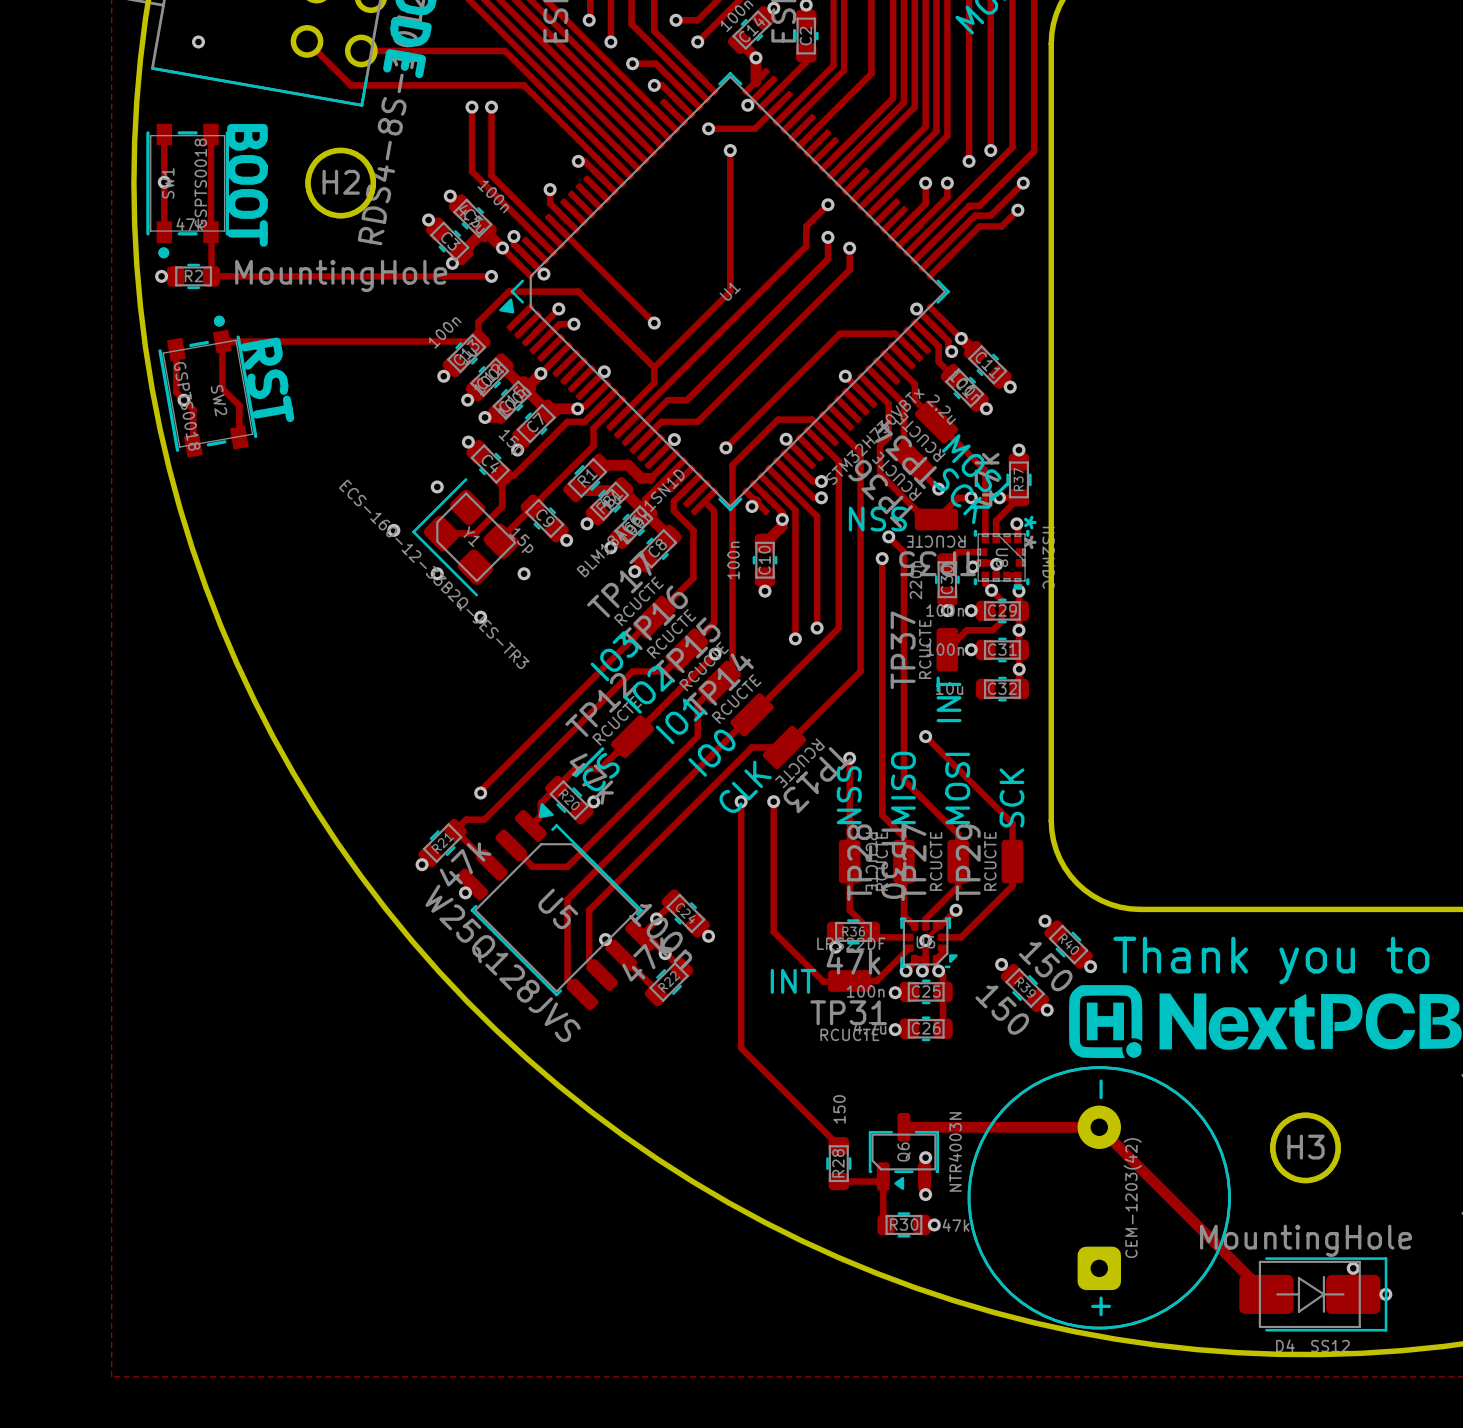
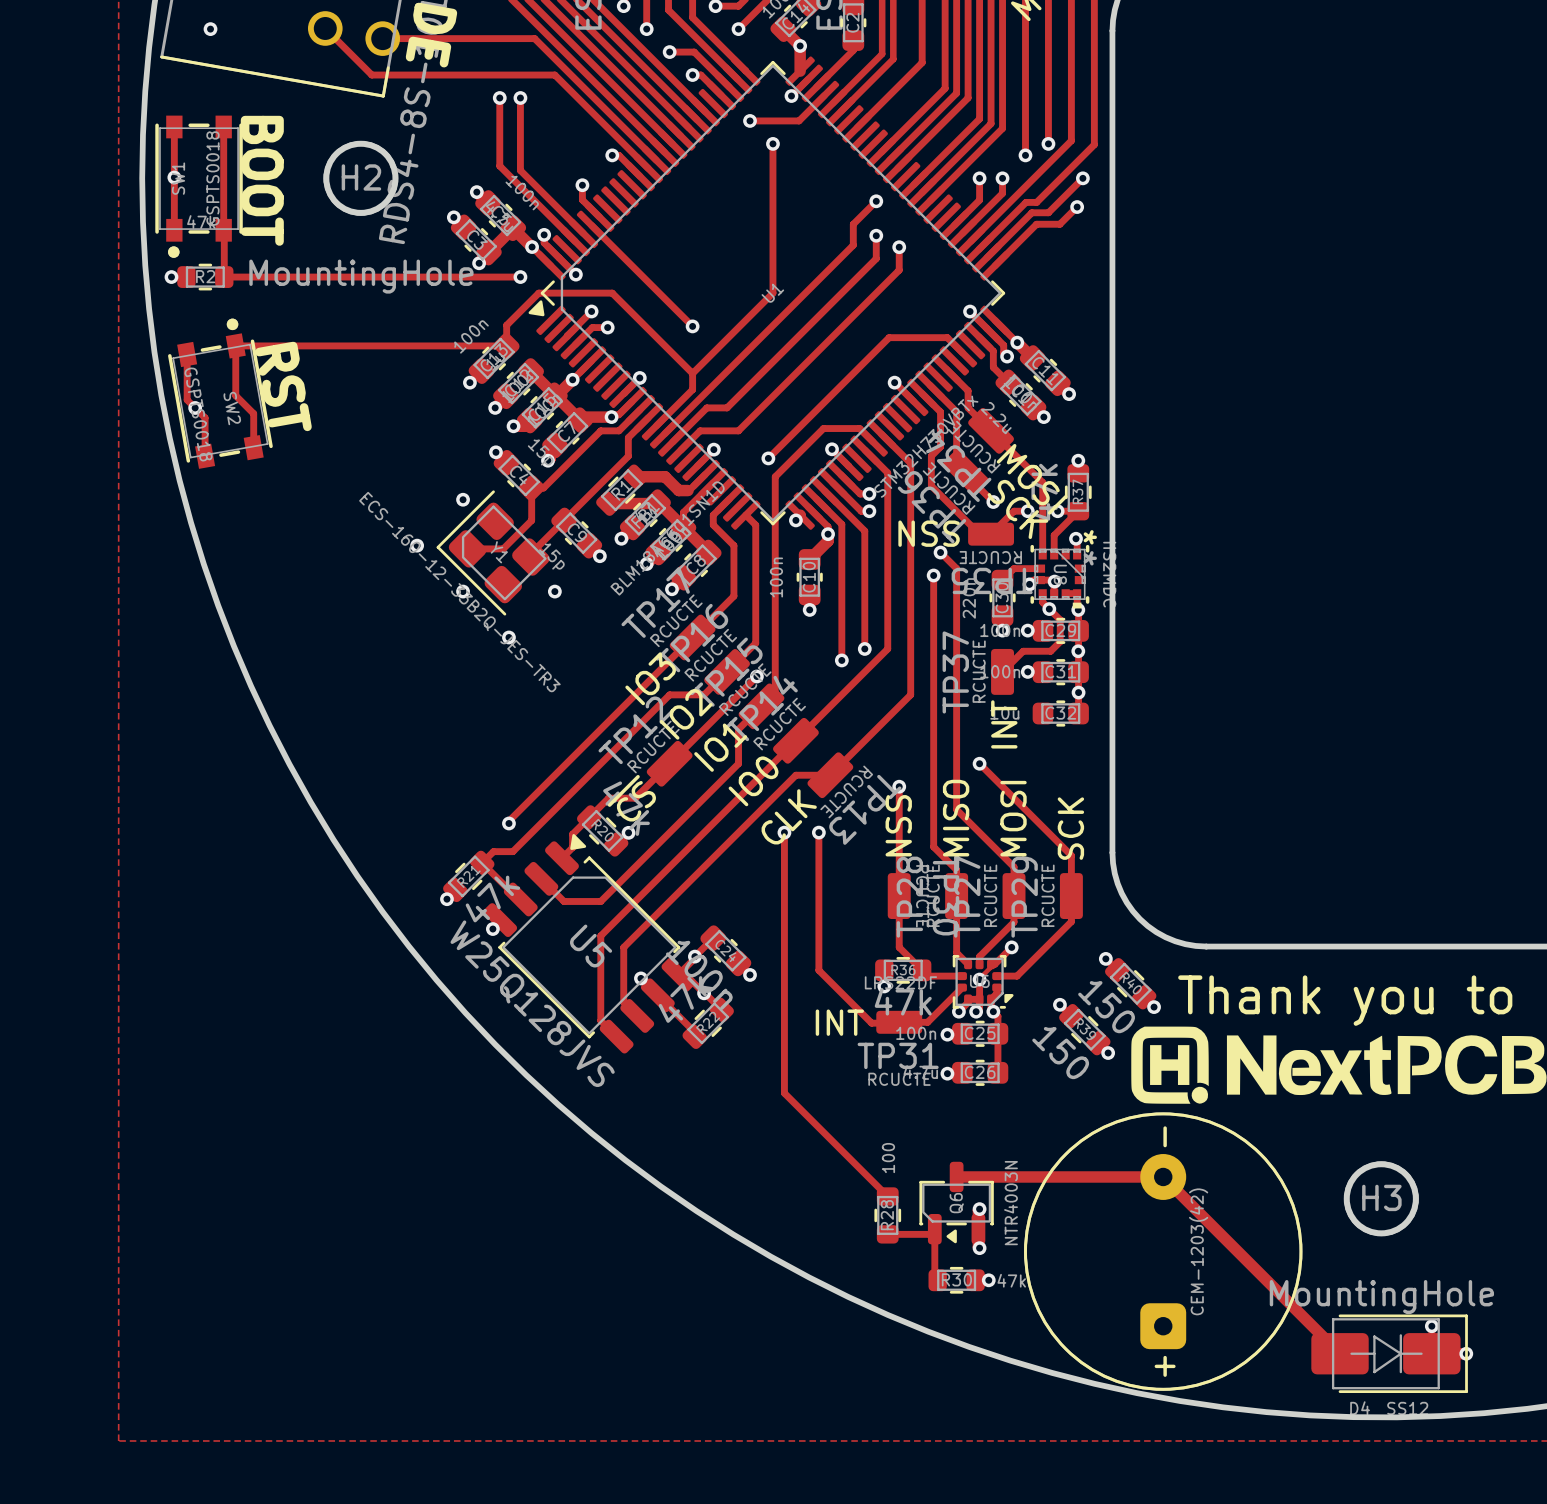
R28 value: 150 (839, 1109) -> 100 (888, 1158)

